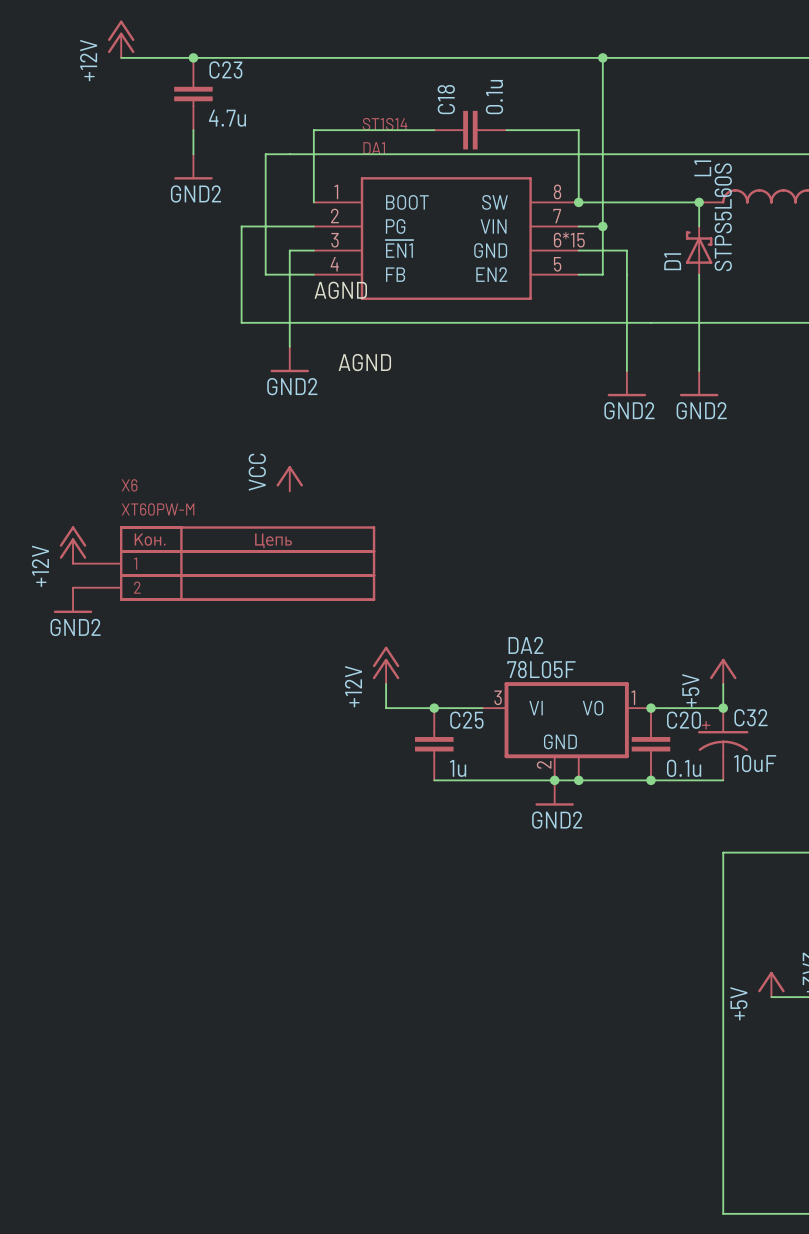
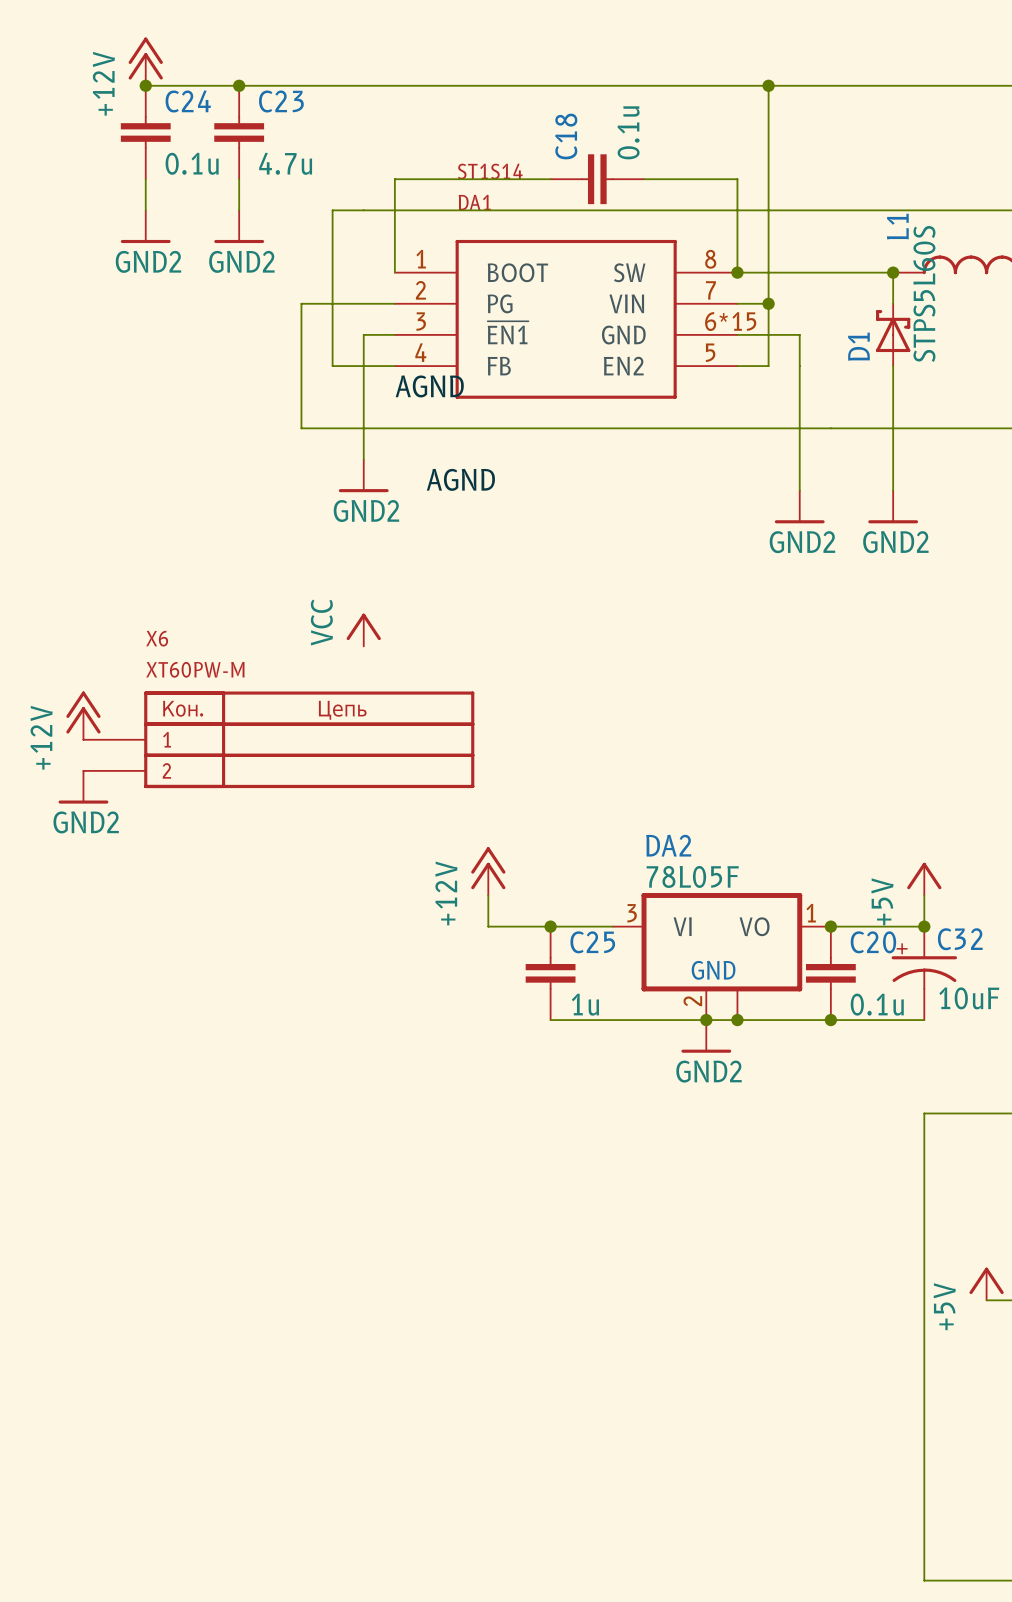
junction: none -> (145, 85)
C24: none -> 0.1u (145, 132)
wire: none -> (145, 179) (145, 210)
power symbol: none -> GND2 (145, 226)

